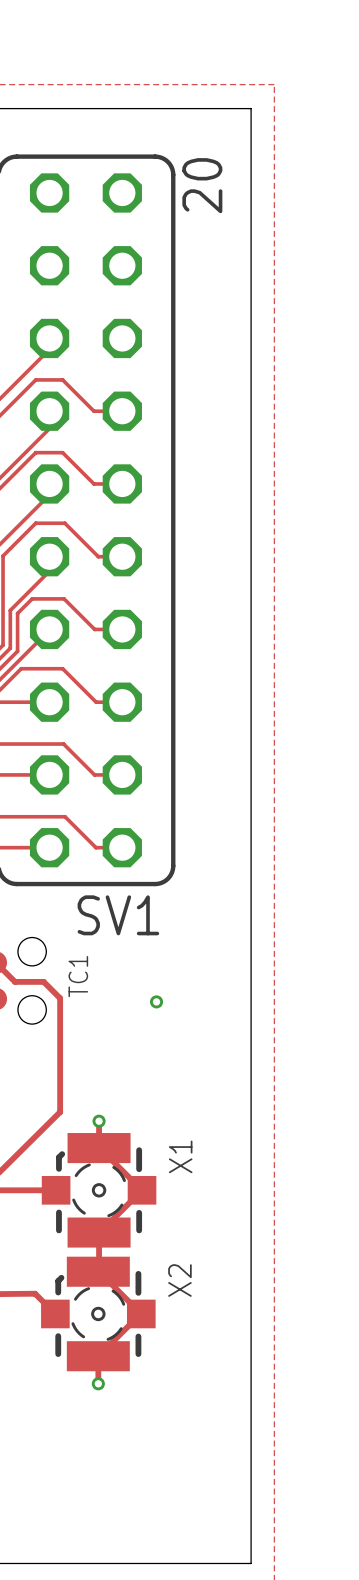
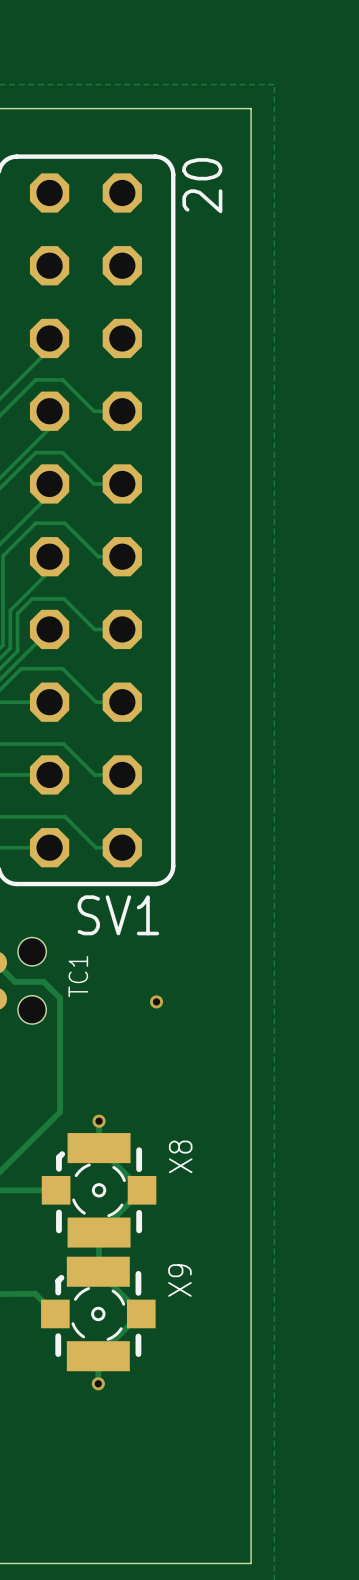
X1 name: X1 (180, 1156) -> X8 (180, 1156)
X2 name: X2 (179, 1280) -> X9 (179, 1280)

